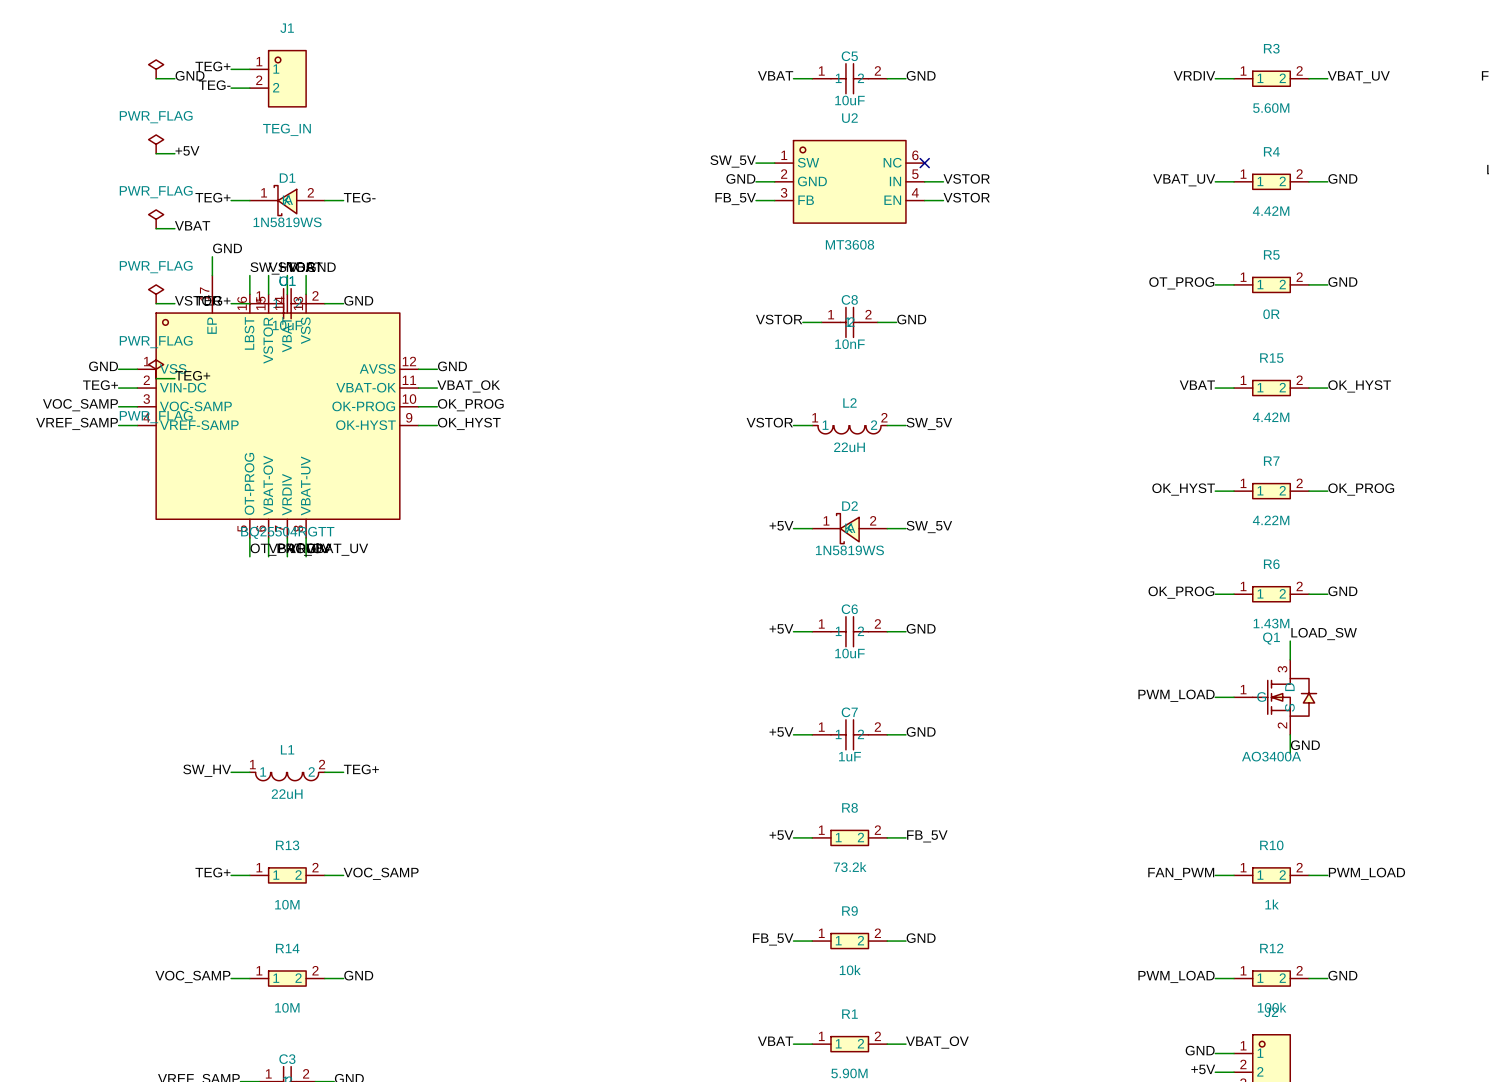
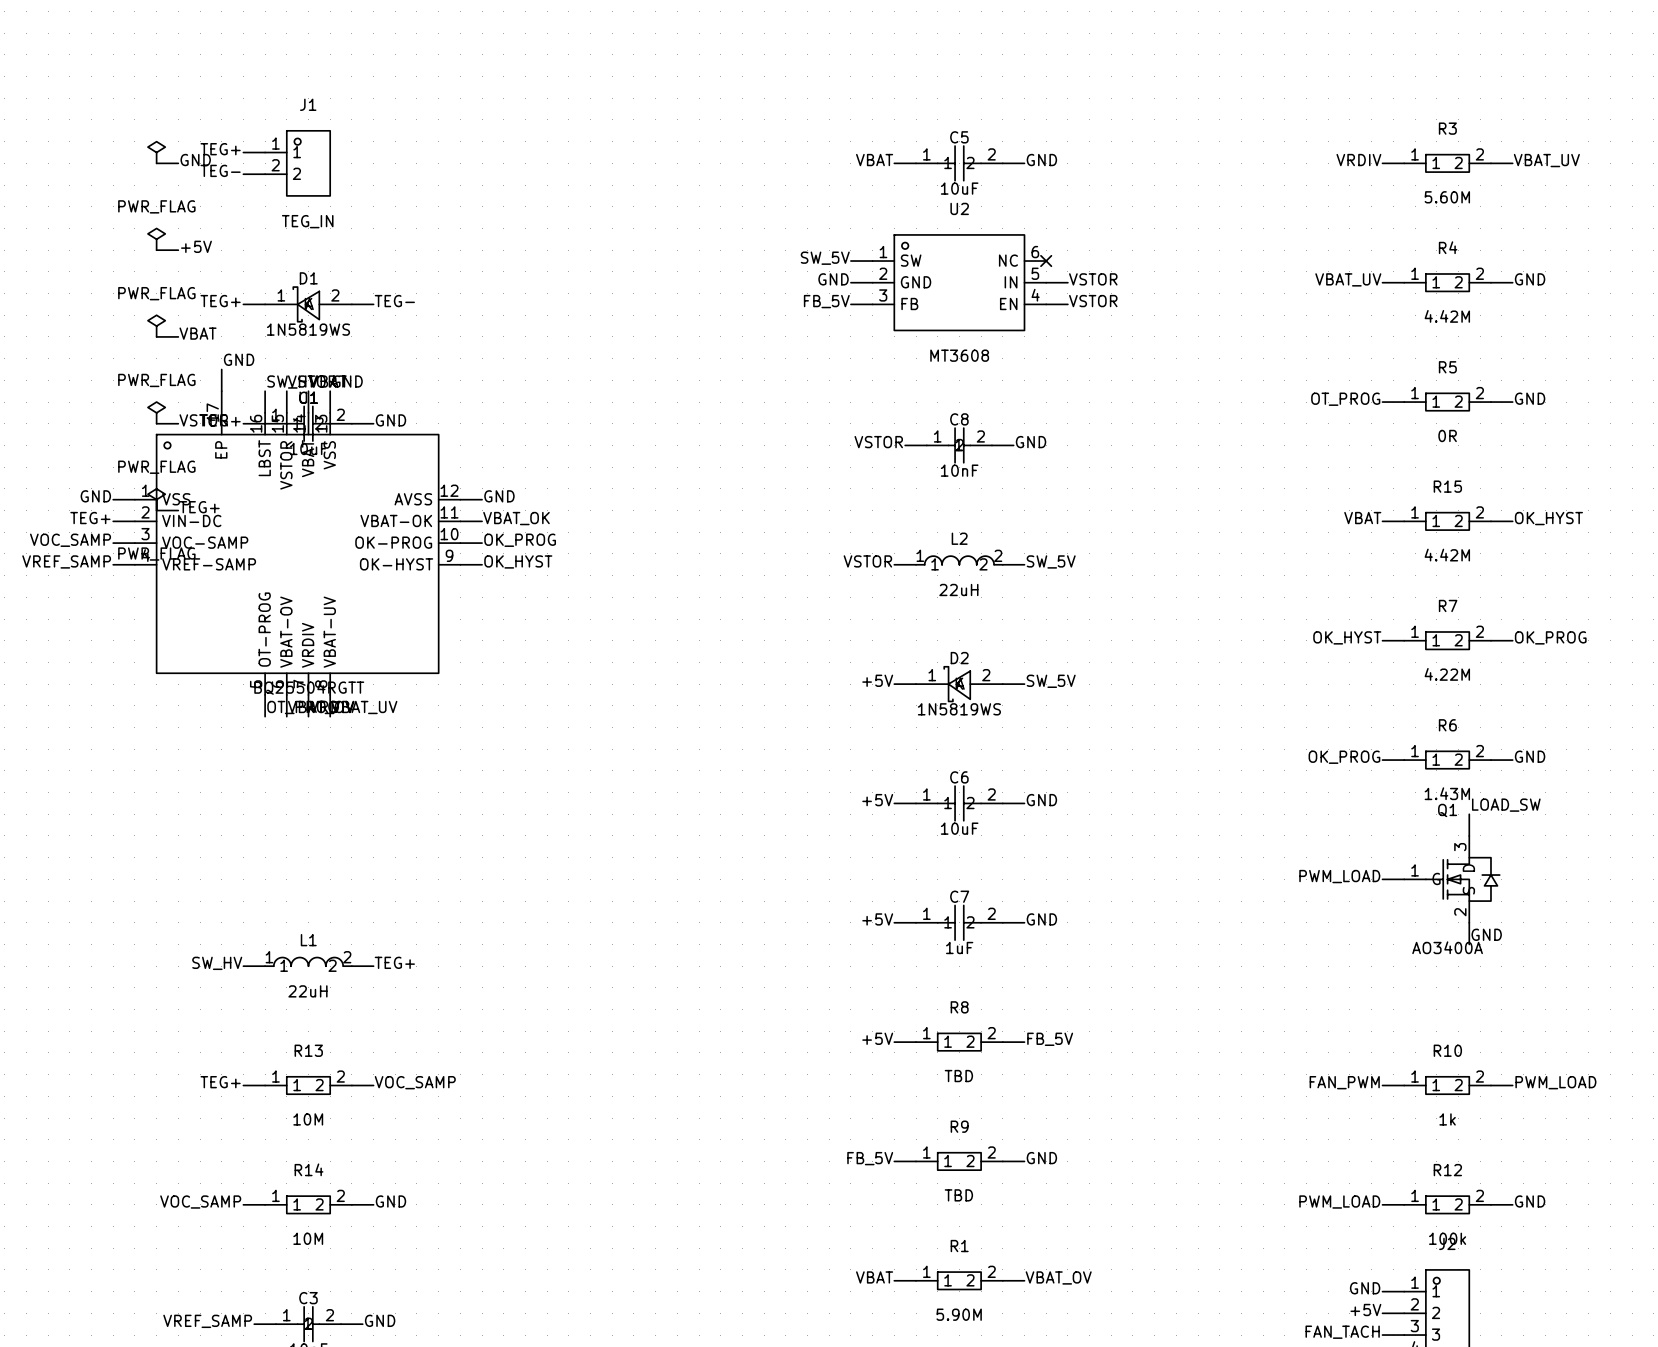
L2 symbol: [812, 425, 888, 434] -> [916, 556, 1003, 565]
L1 symbol: [249, 772, 325, 781] -> [265, 957, 352, 967]
R8 value: 73.2k (850, 867) -> TBD (958, 1076)
R9 value: 10k (850, 970) -> TBD (958, 1195)

